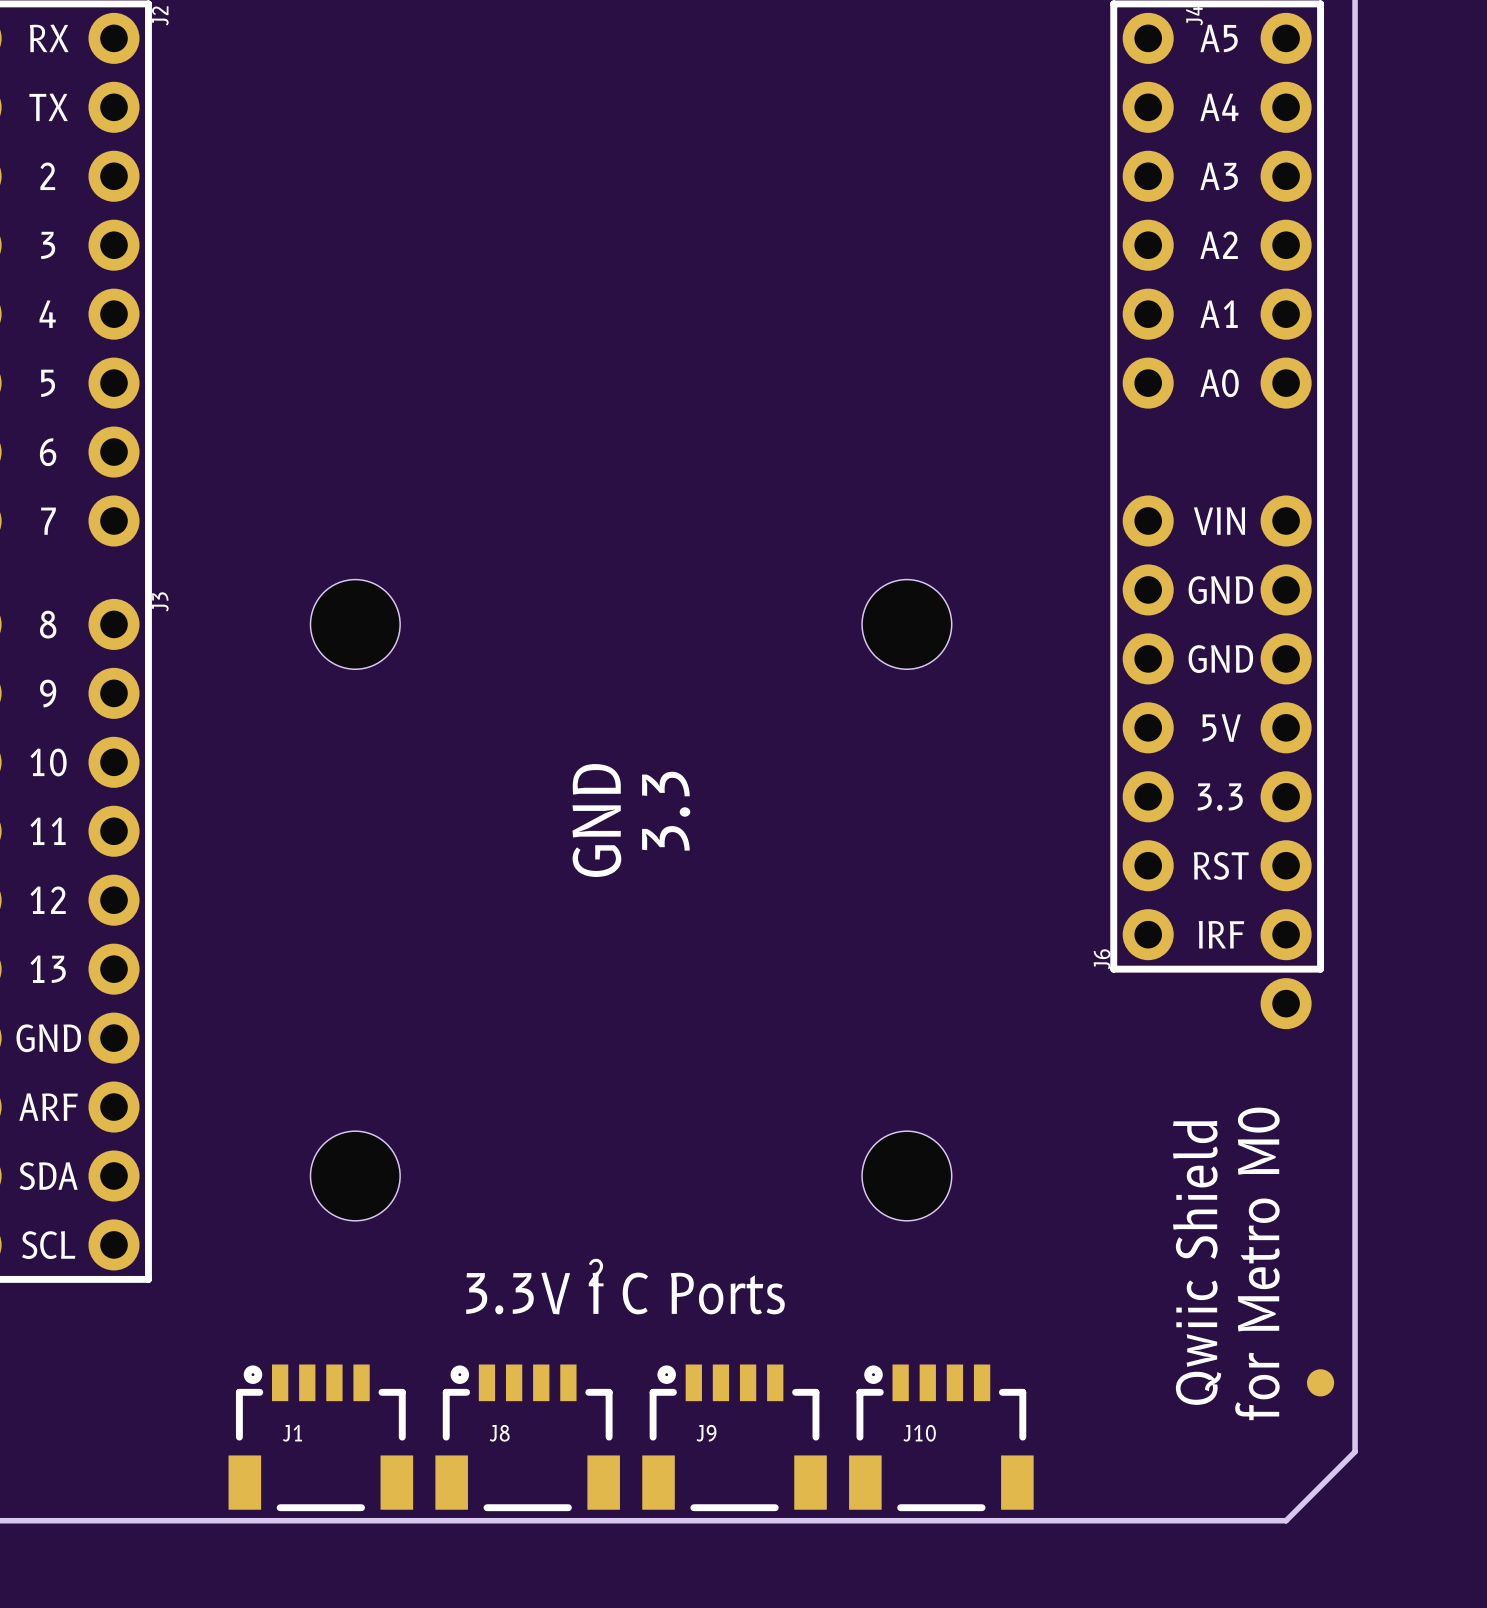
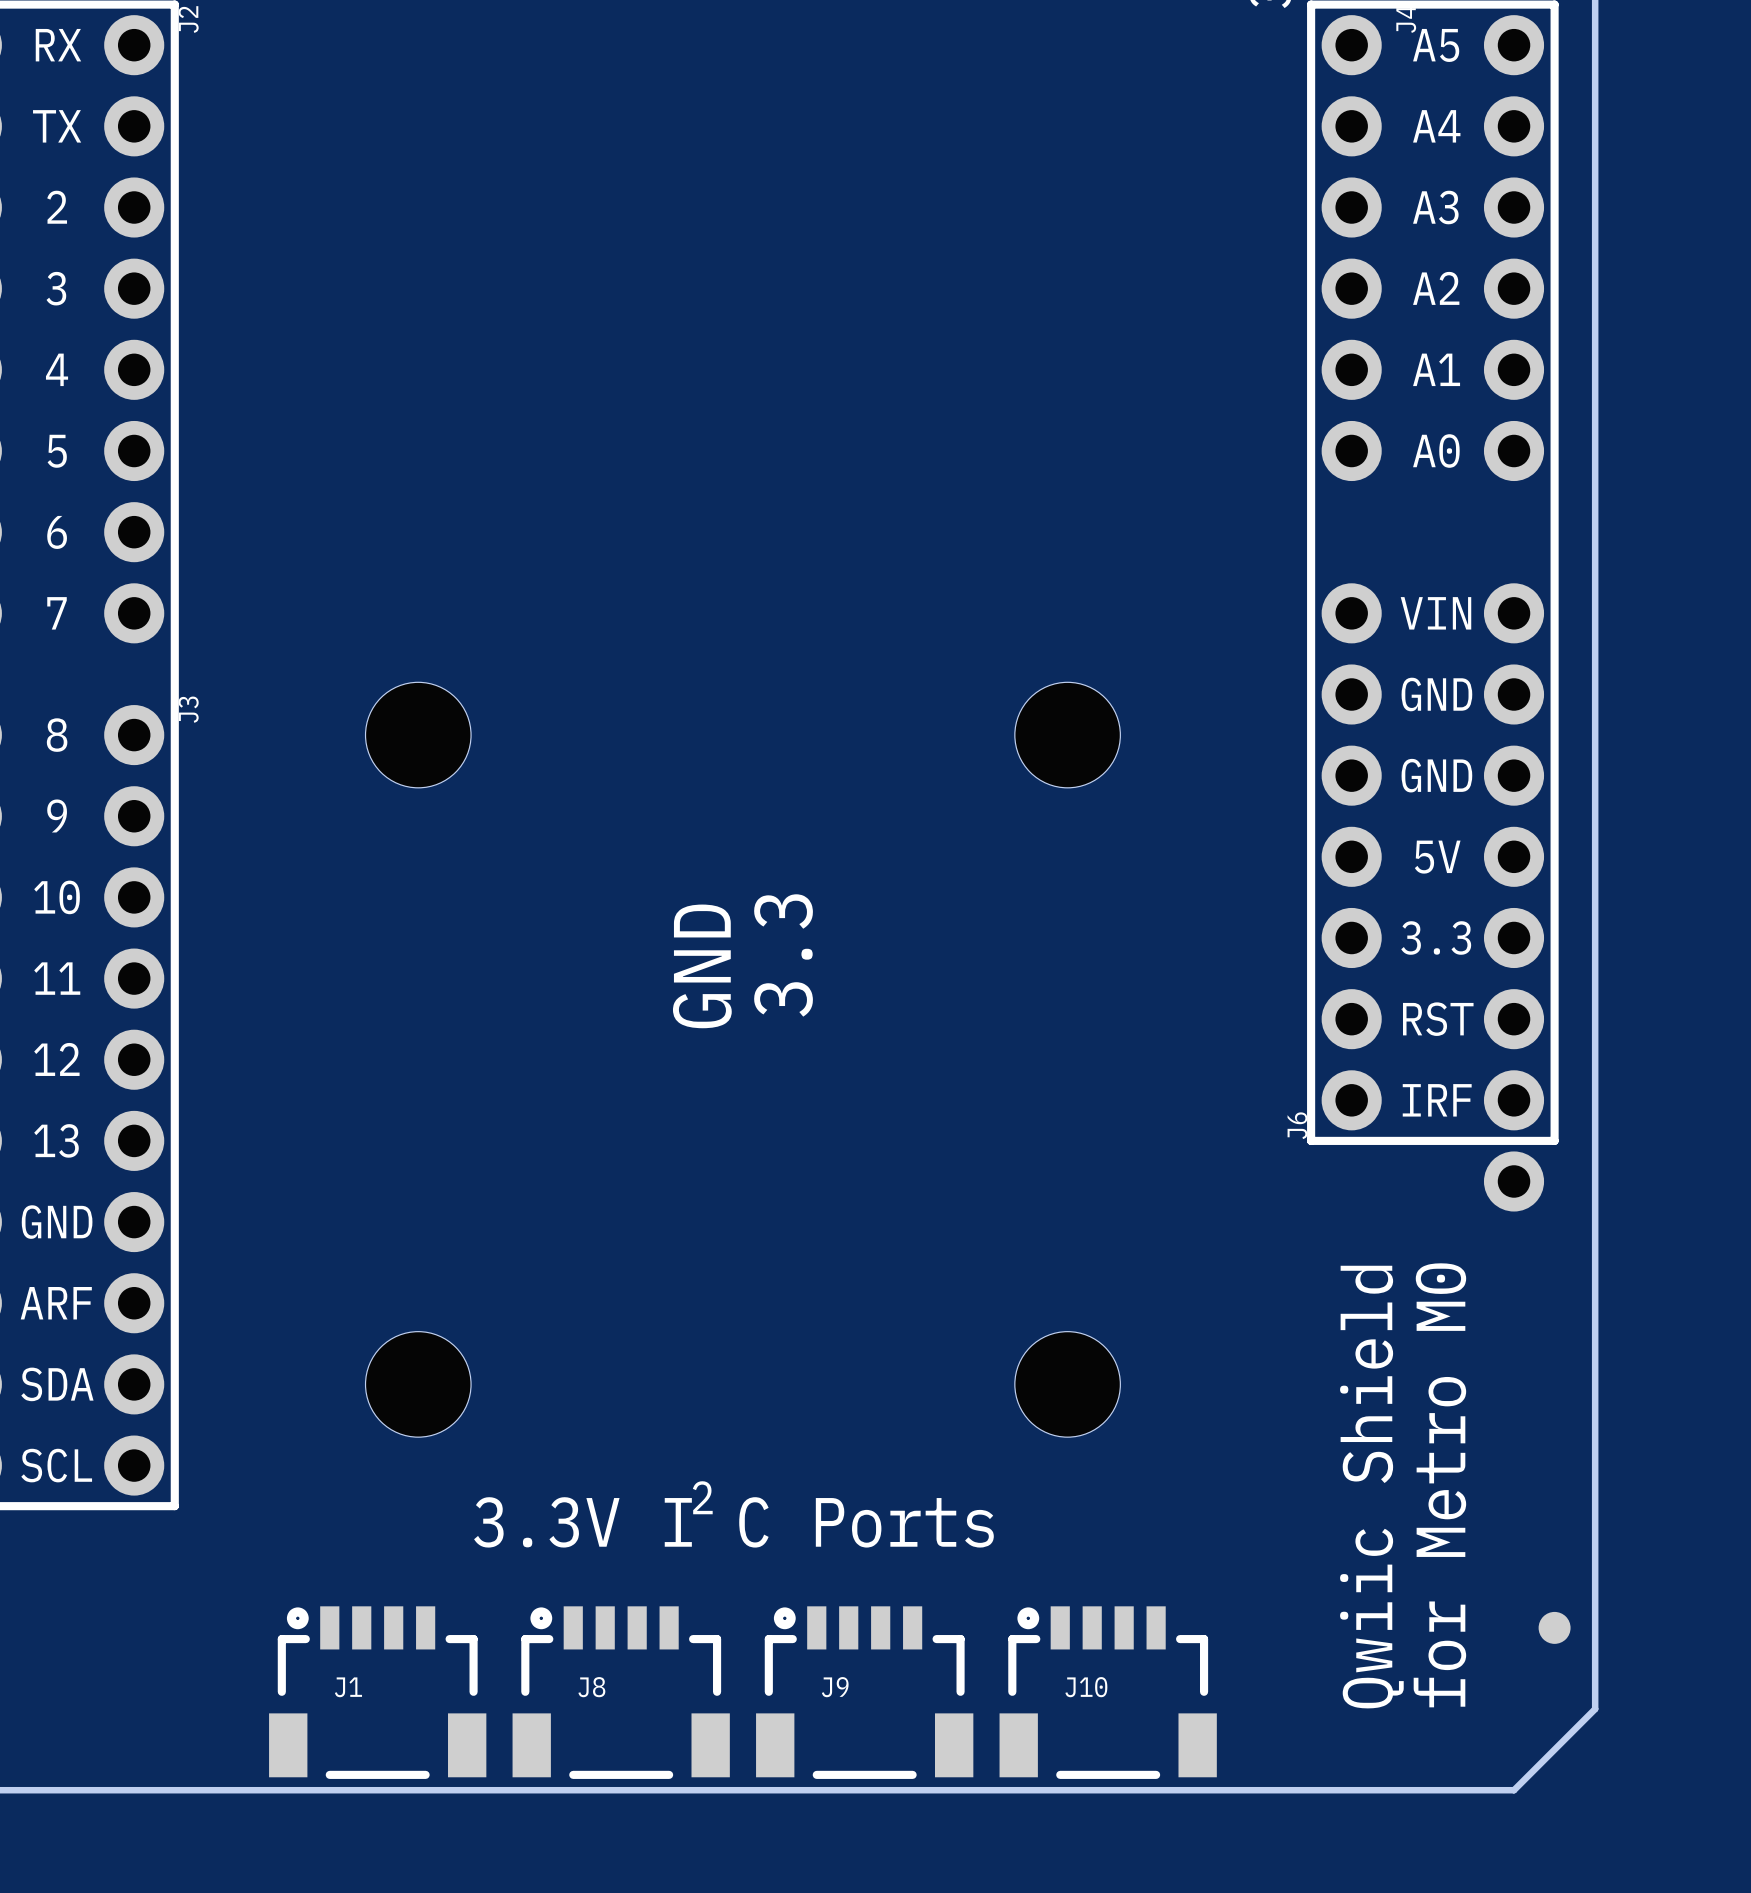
text position: Qwiic Shield (1197, 1262) -> Qwiic Shield (1371, 1487)
text position: for Metro M0 (1257, 1263) -> for Metro M0 (1439, 1485)

